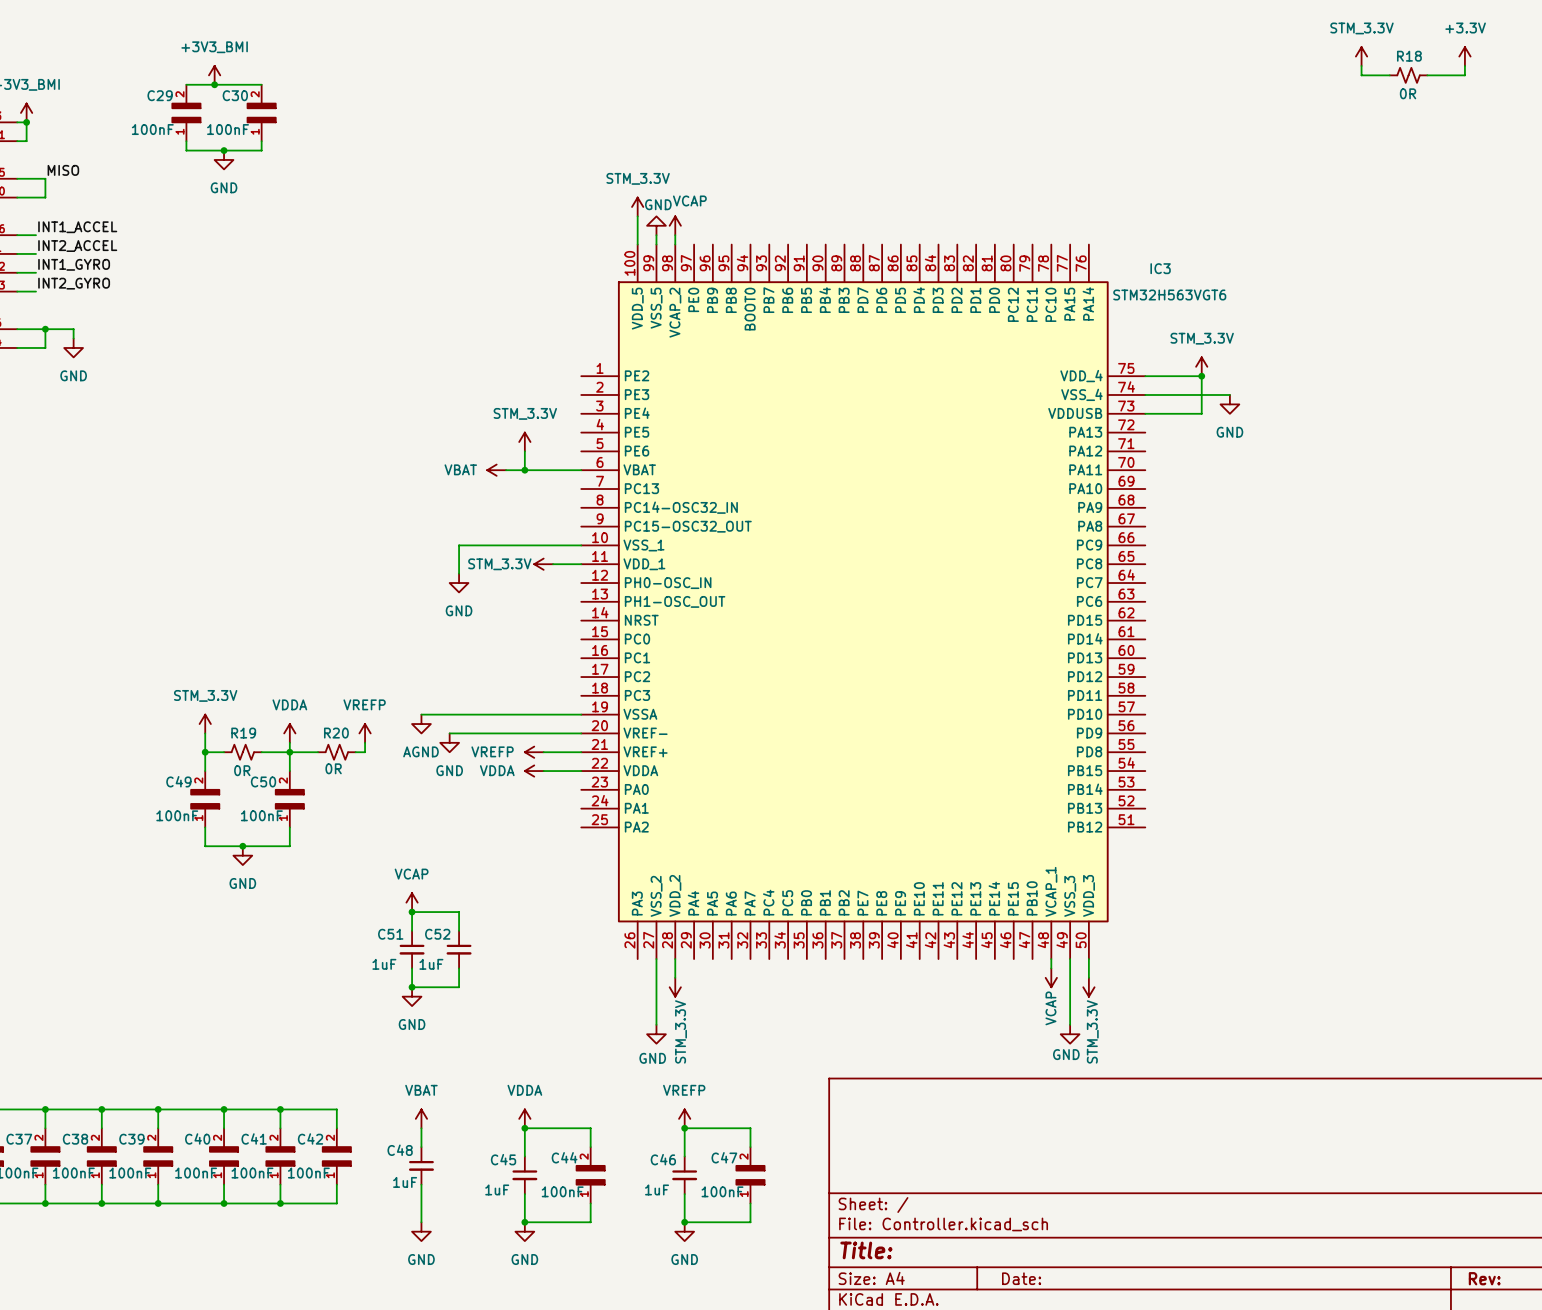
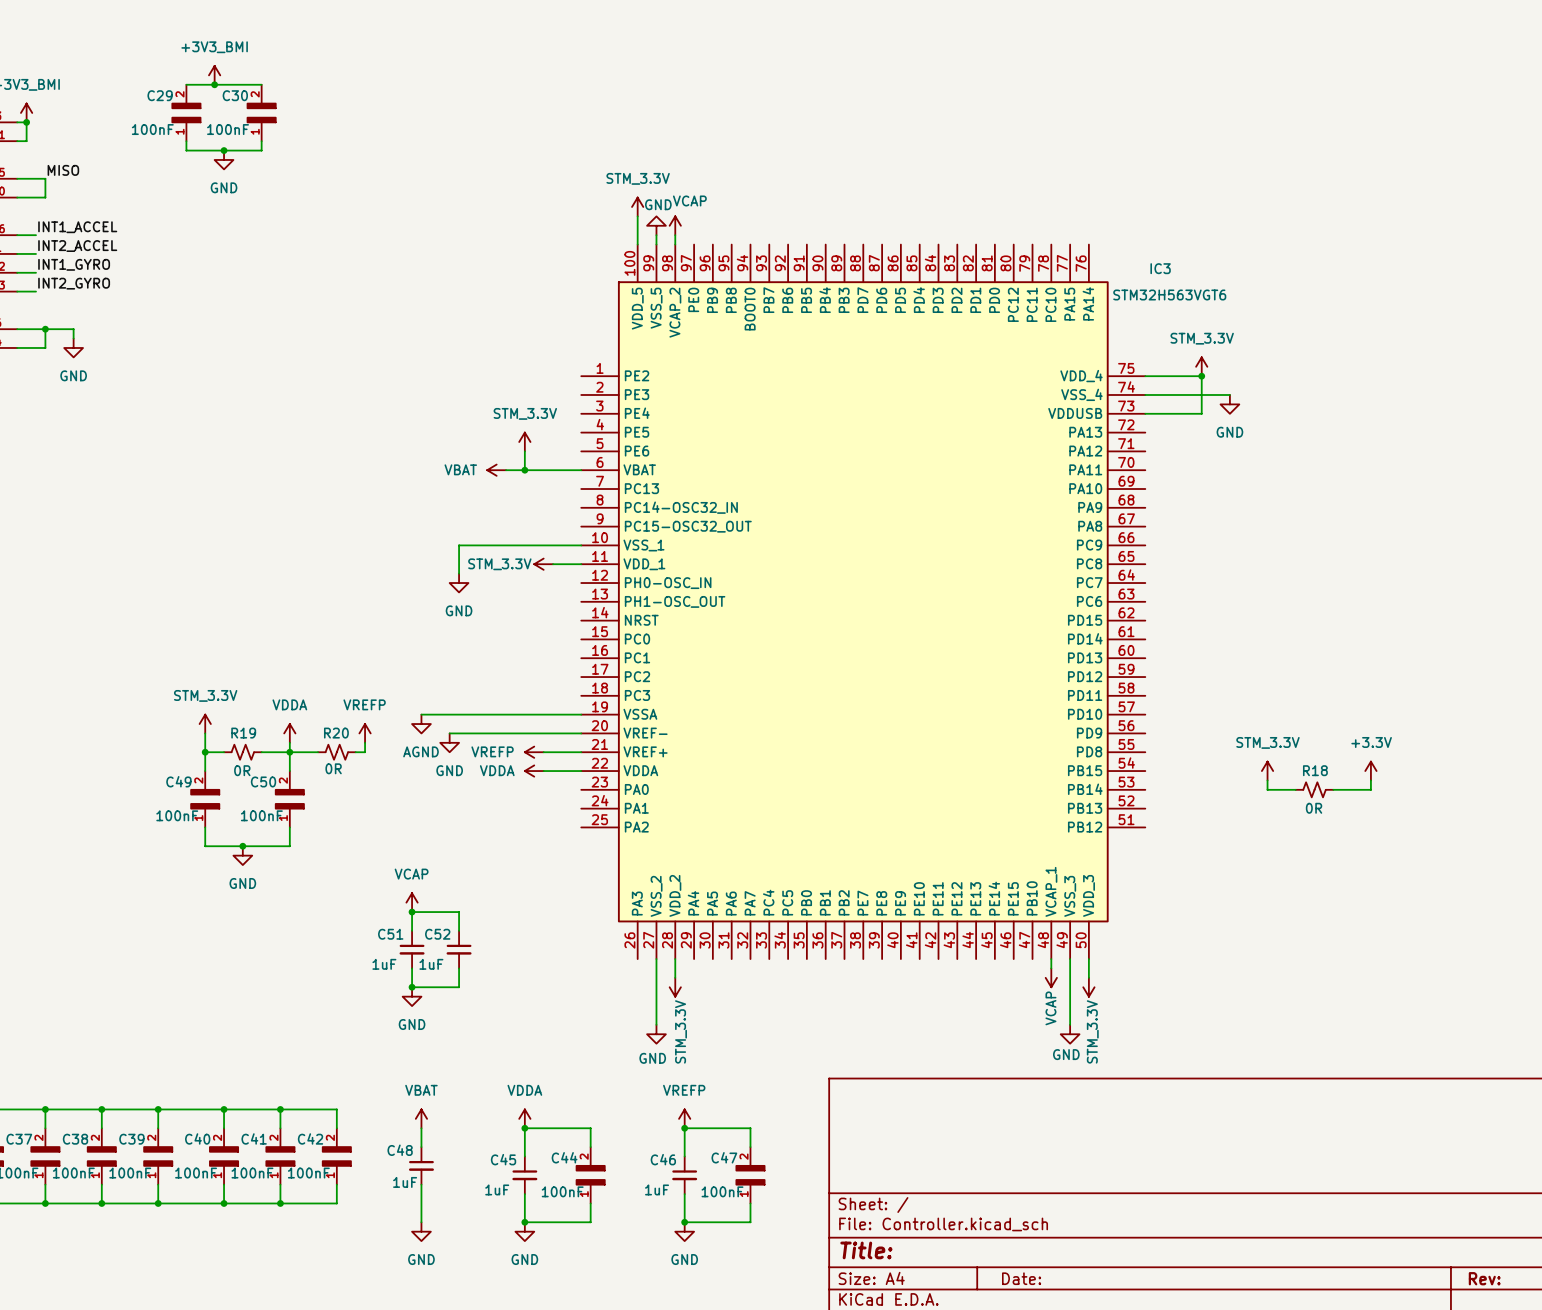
power symbol: STM_3.3V (1361, 56) -> none
power symbol: +3.3V (1464, 56) -> none
wire: (1361, 65) (1361, 75) (1389, 75) -> none
wire: (1464, 65) (1464, 75) (1427, 75) -> none
R18 position: (1408, 75) -> (1314, 789)
power symbol: none -> STM_3.3V (1267, 771)
power symbol: none -> +3.3V (1370, 771)
wire: none -> (1267, 780) (1267, 789) (1295, 789)
wire: none -> (1370, 780) (1370, 789) (1333, 789)

